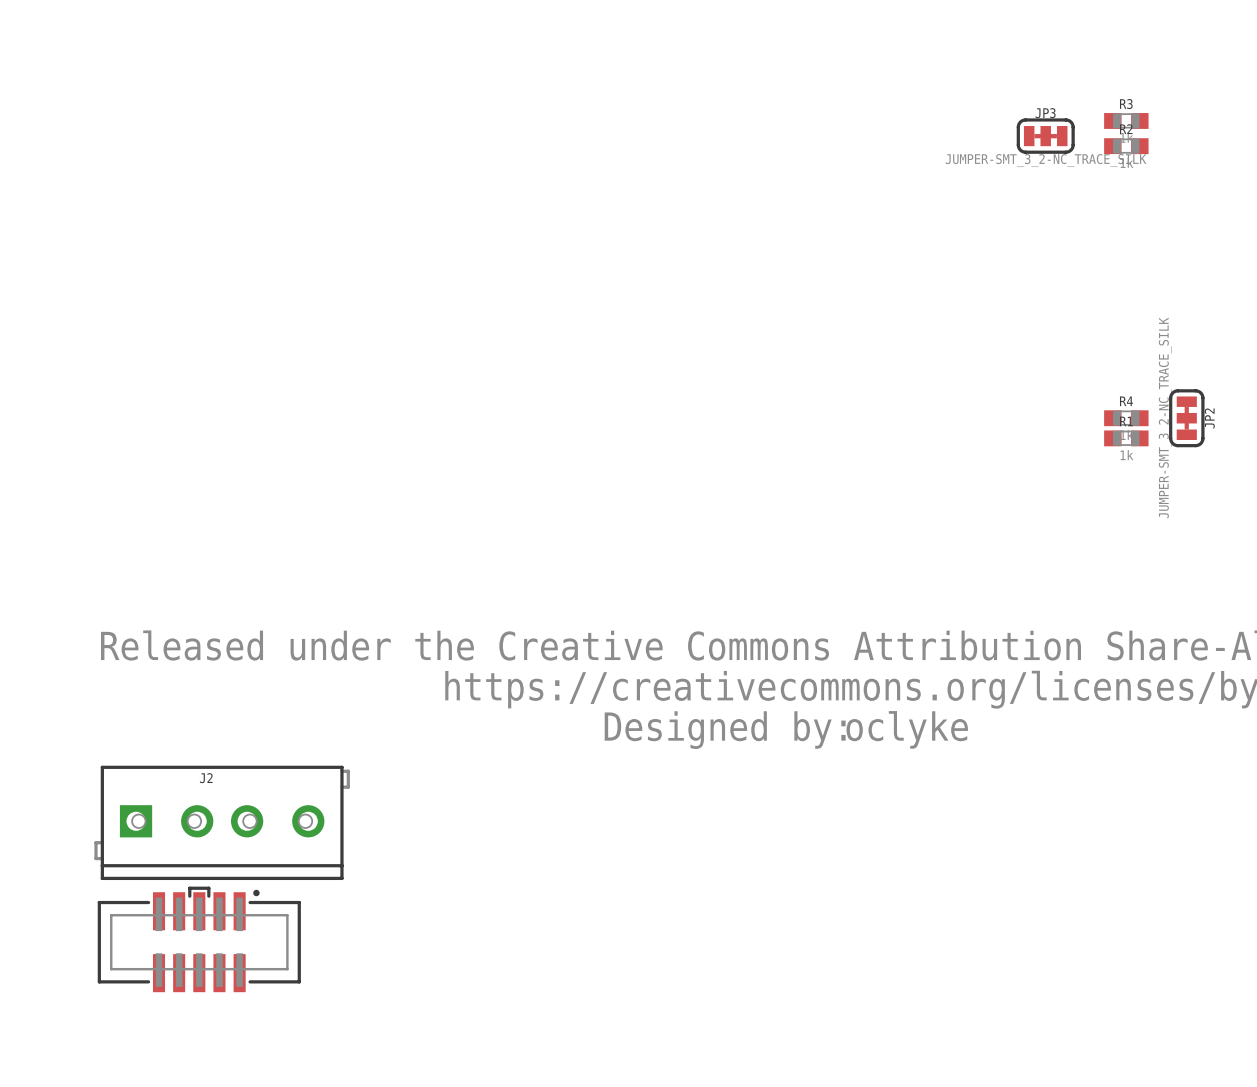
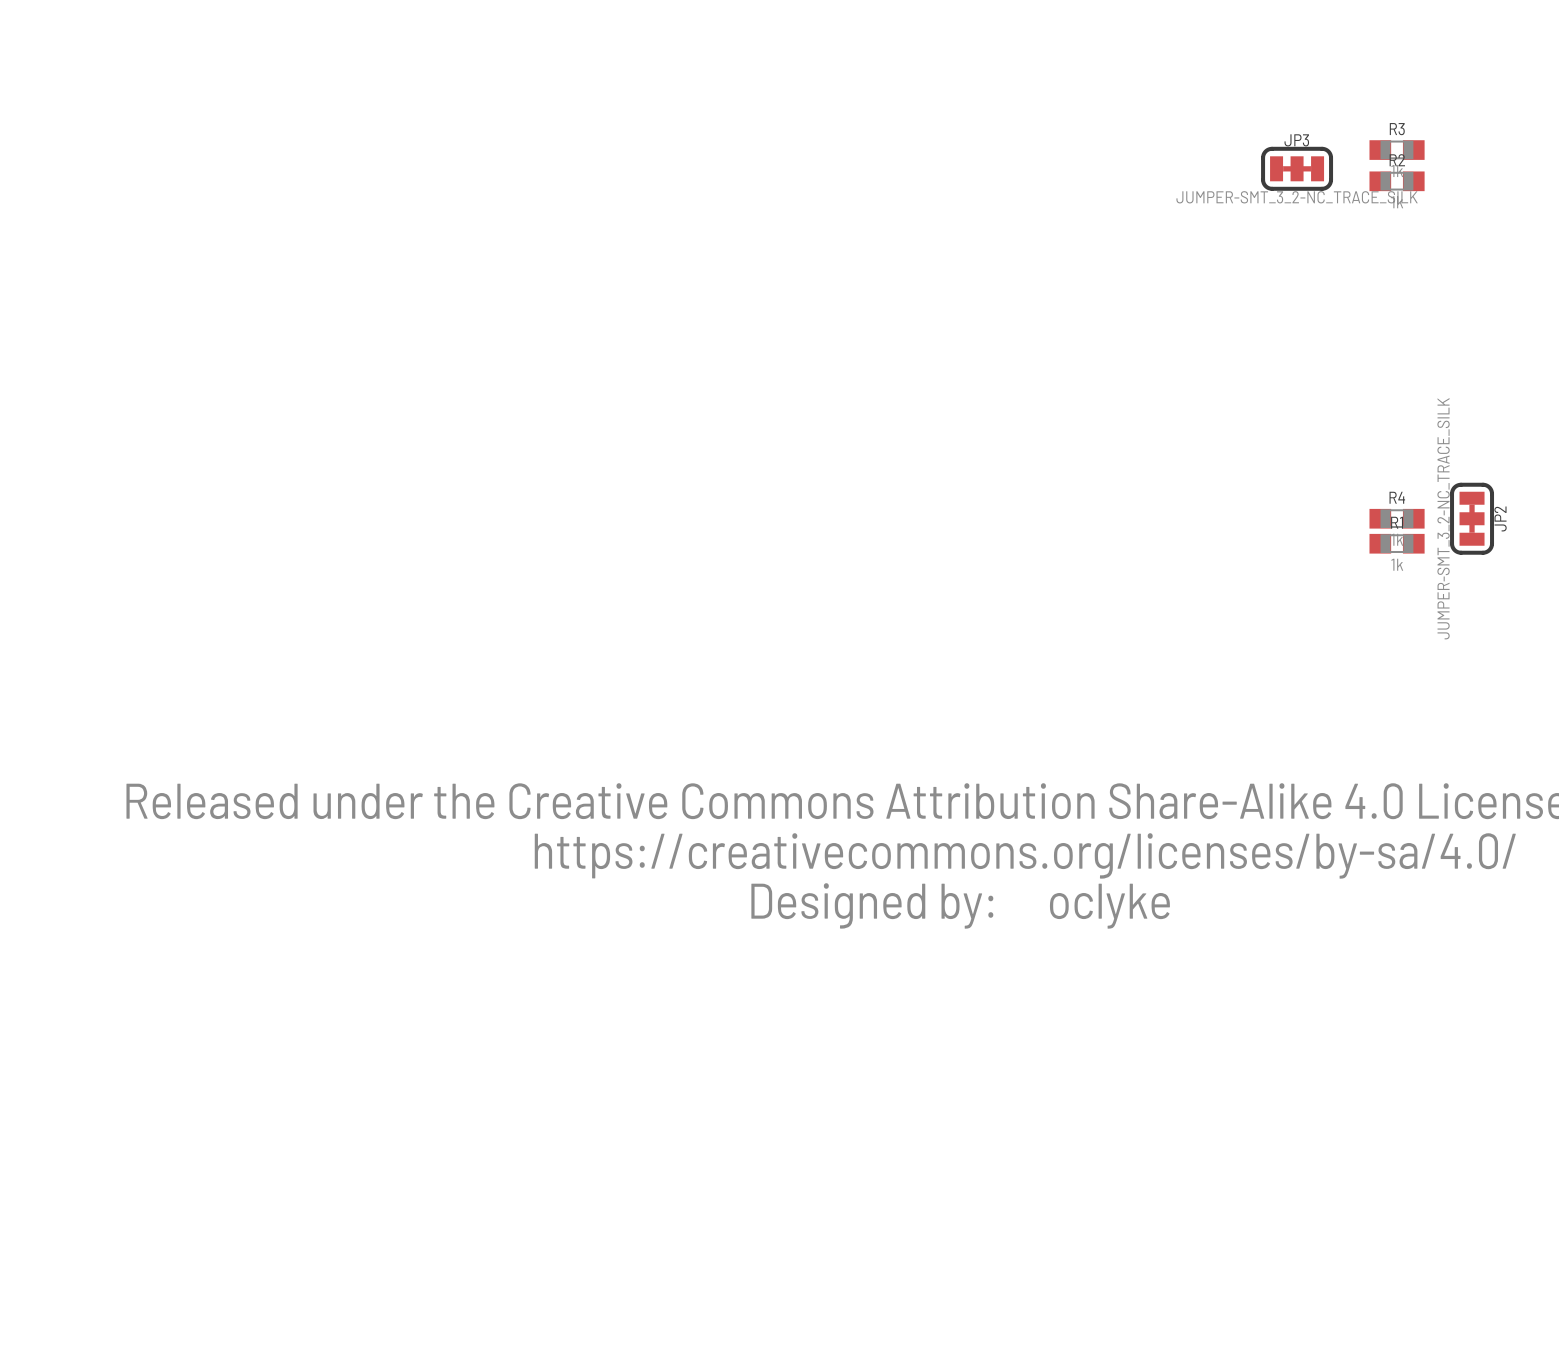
J2: (222, 822) -> none
part: (199, 939) -> none

